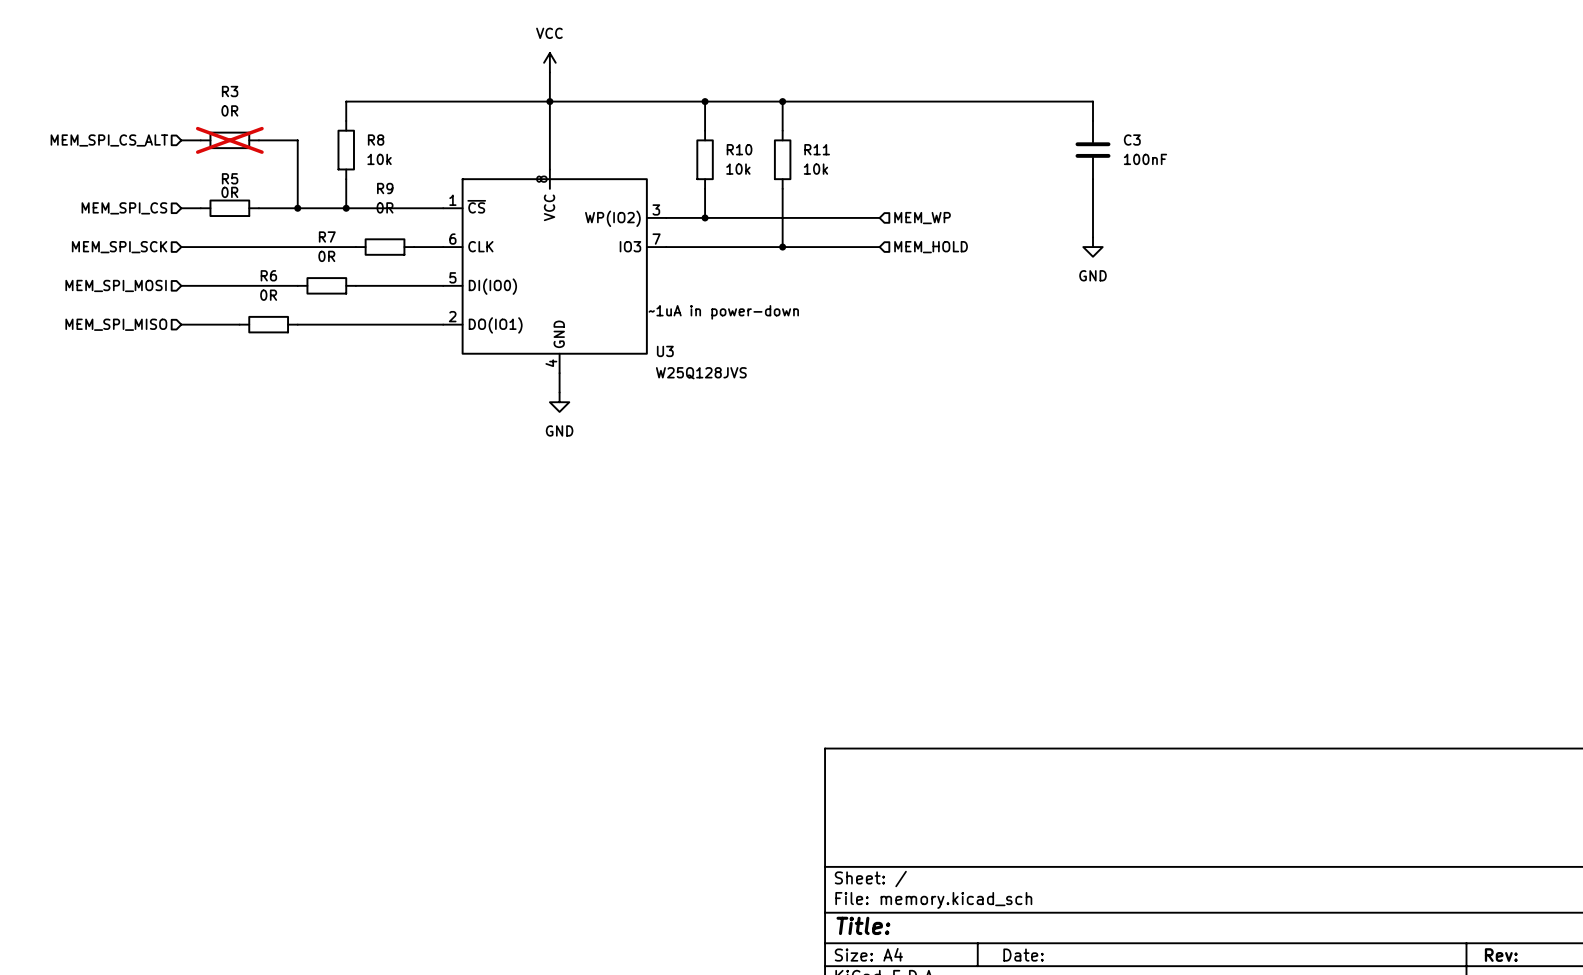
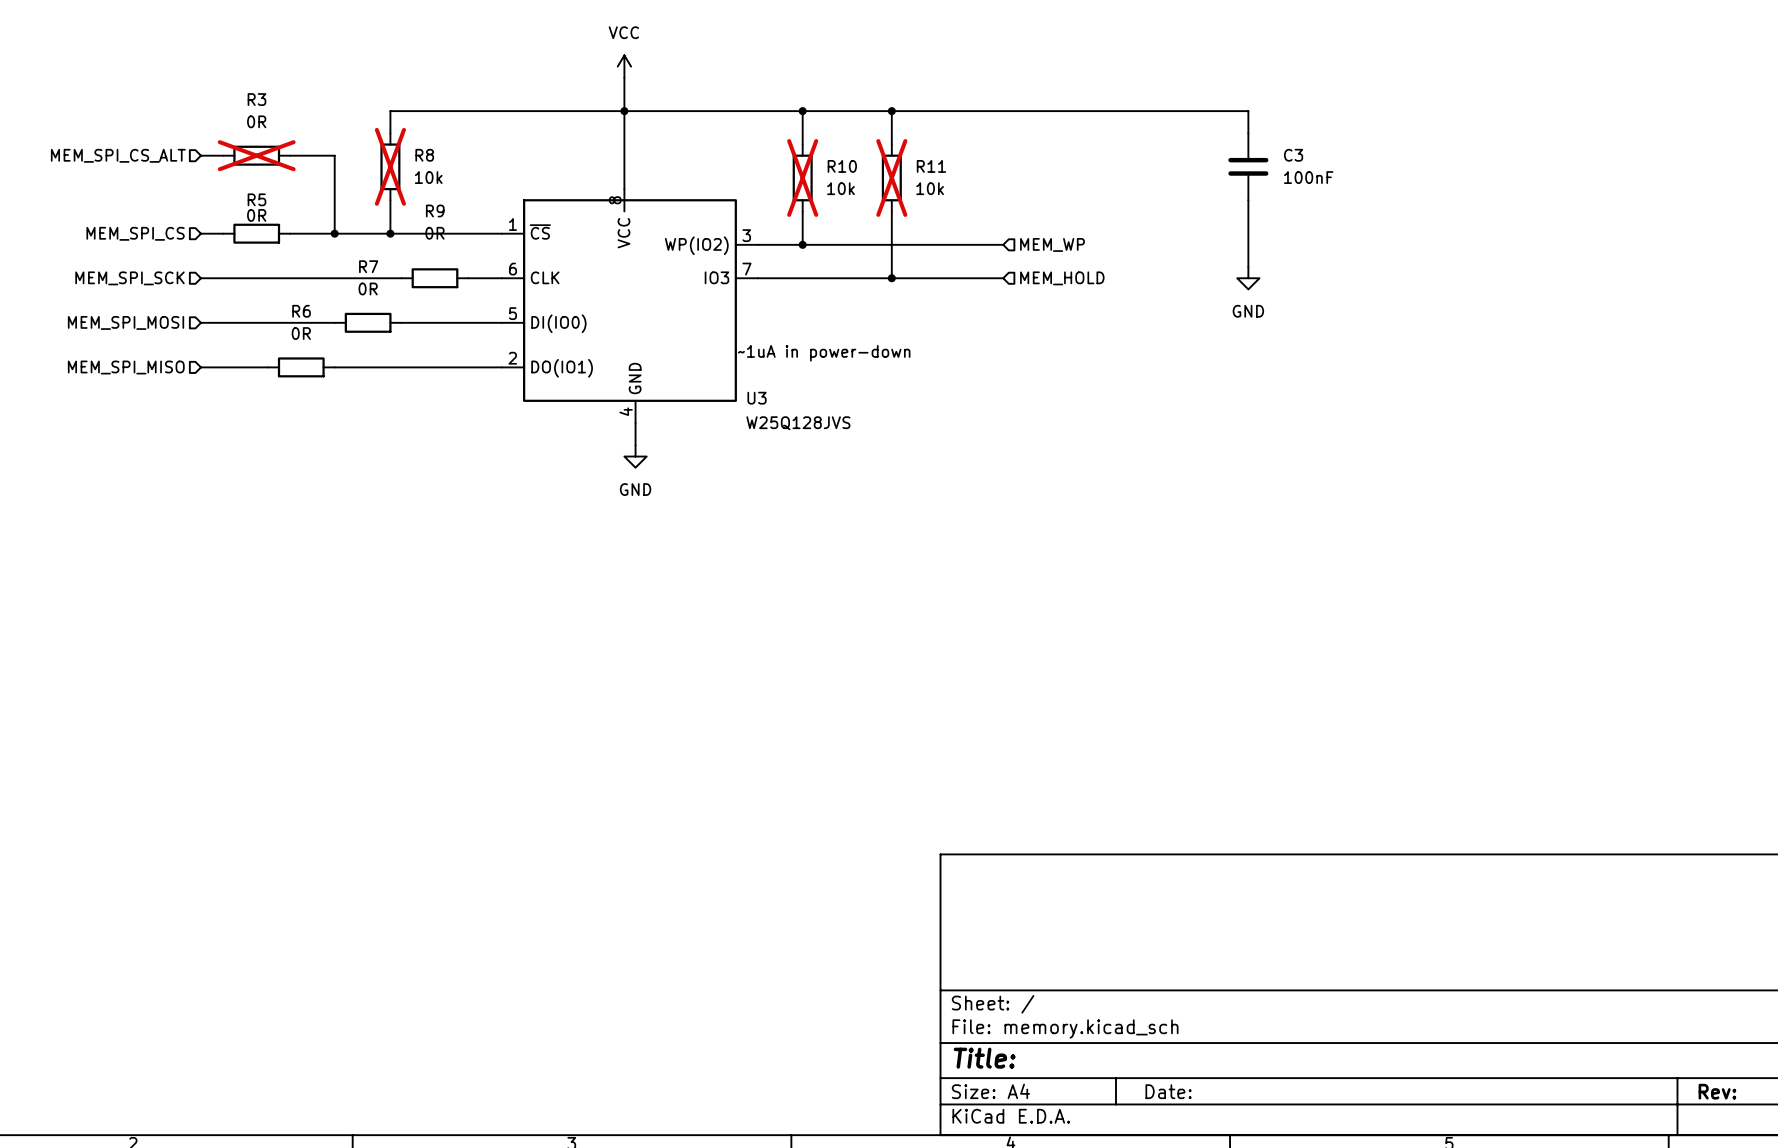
R8 do-not-place cross: none -> (390, 166)
R10 do-not-place cross: none -> (802, 177)
R11 do-not-place cross: none -> (891, 177)

